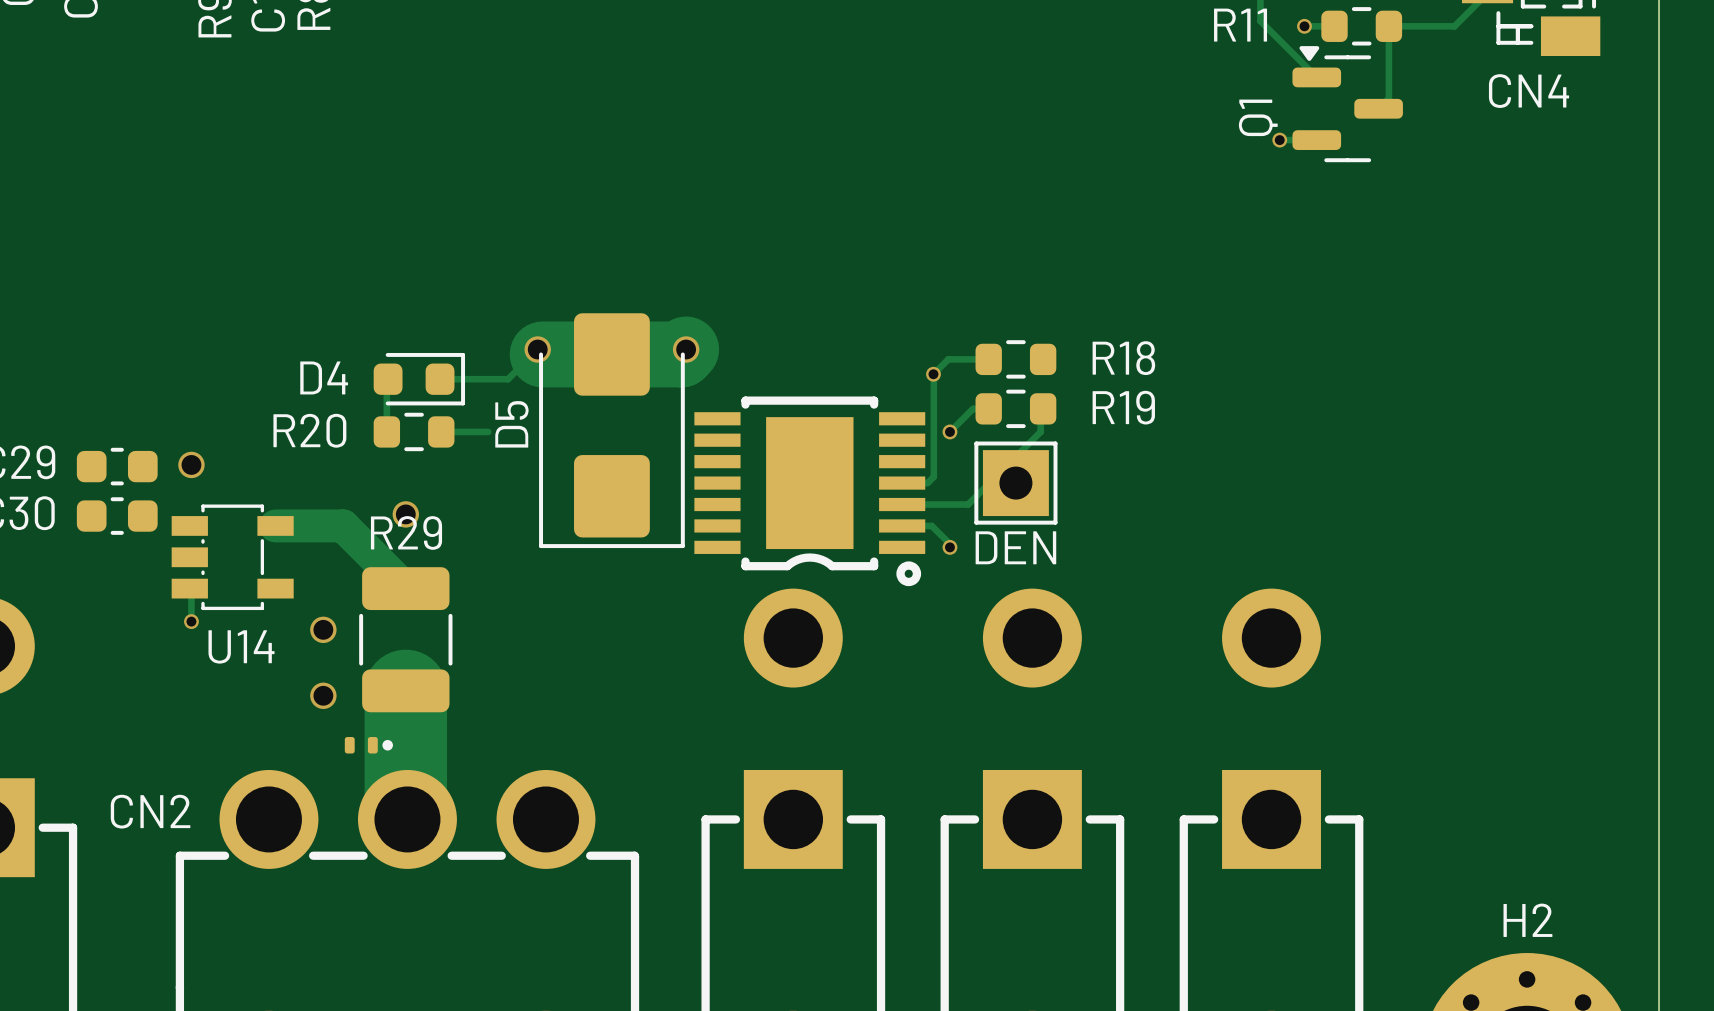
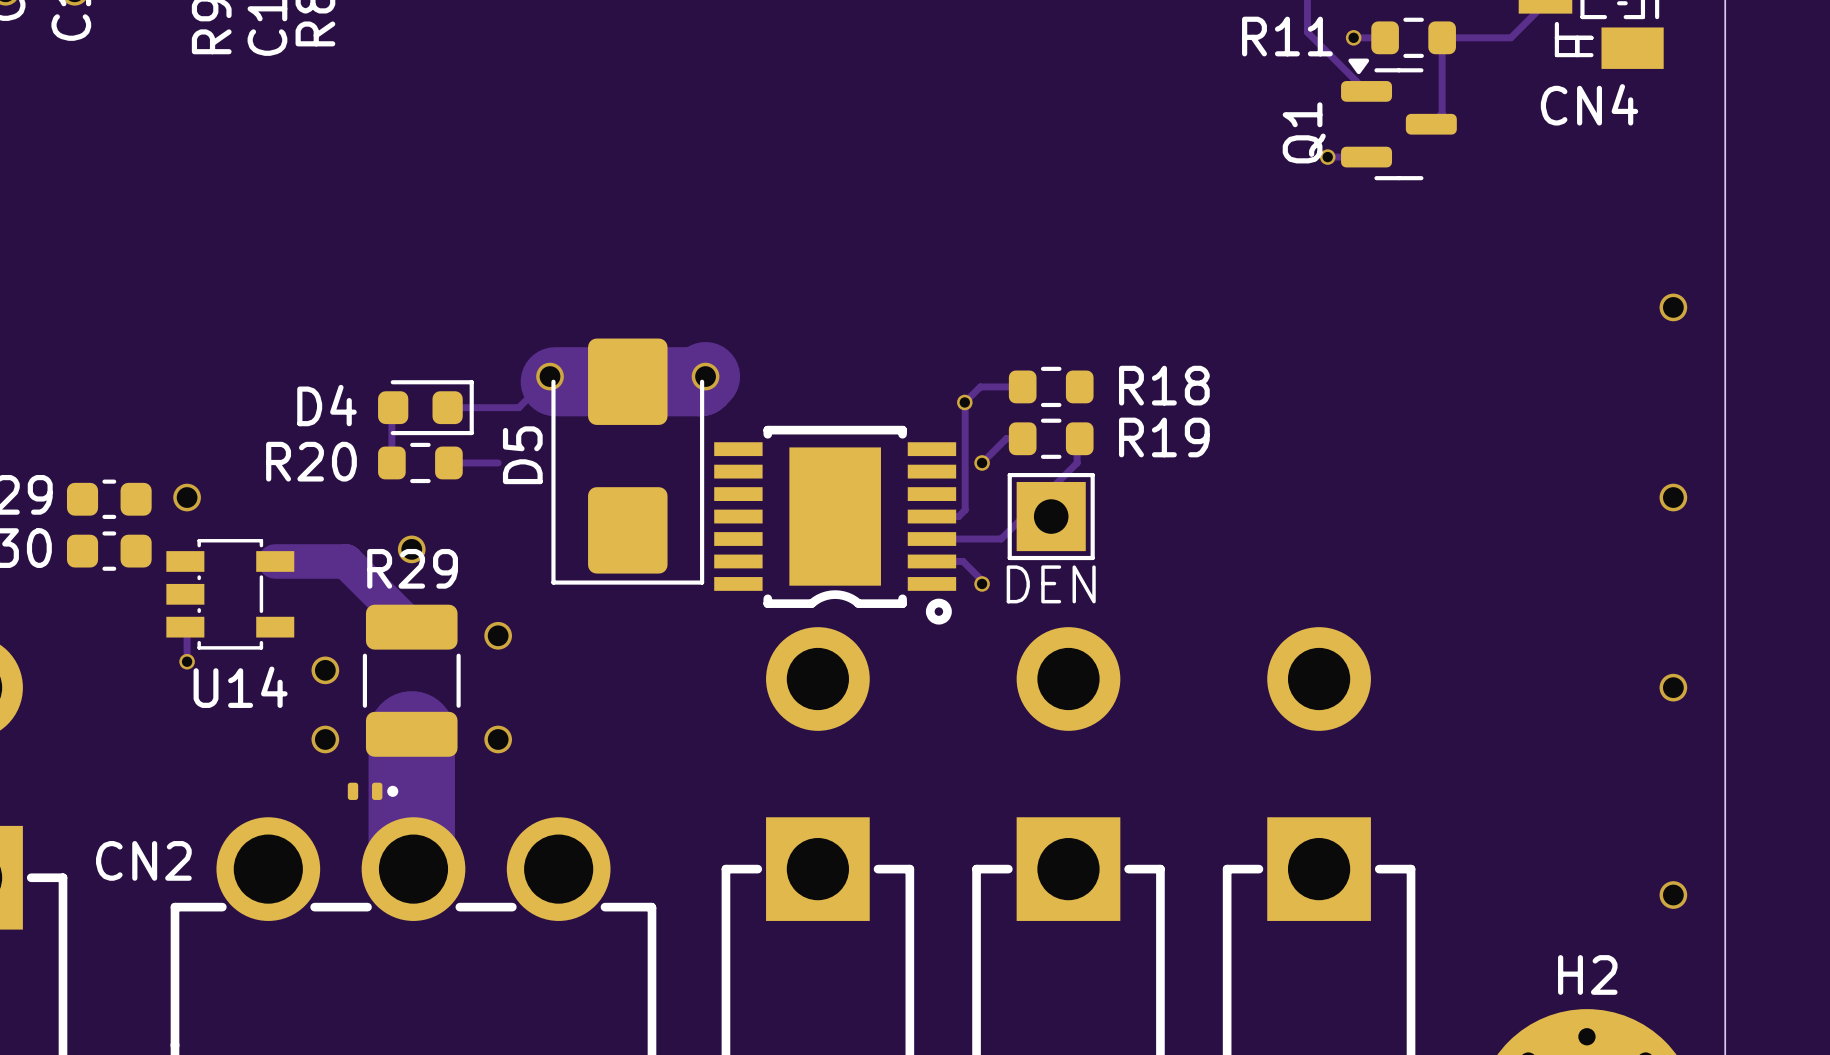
via: none -> (1673, 307)
via: none -> (1673, 497)
via: none -> (498, 635)
via: none -> (1673, 687)
via: none -> (498, 739)
via: none -> (1673, 895)

